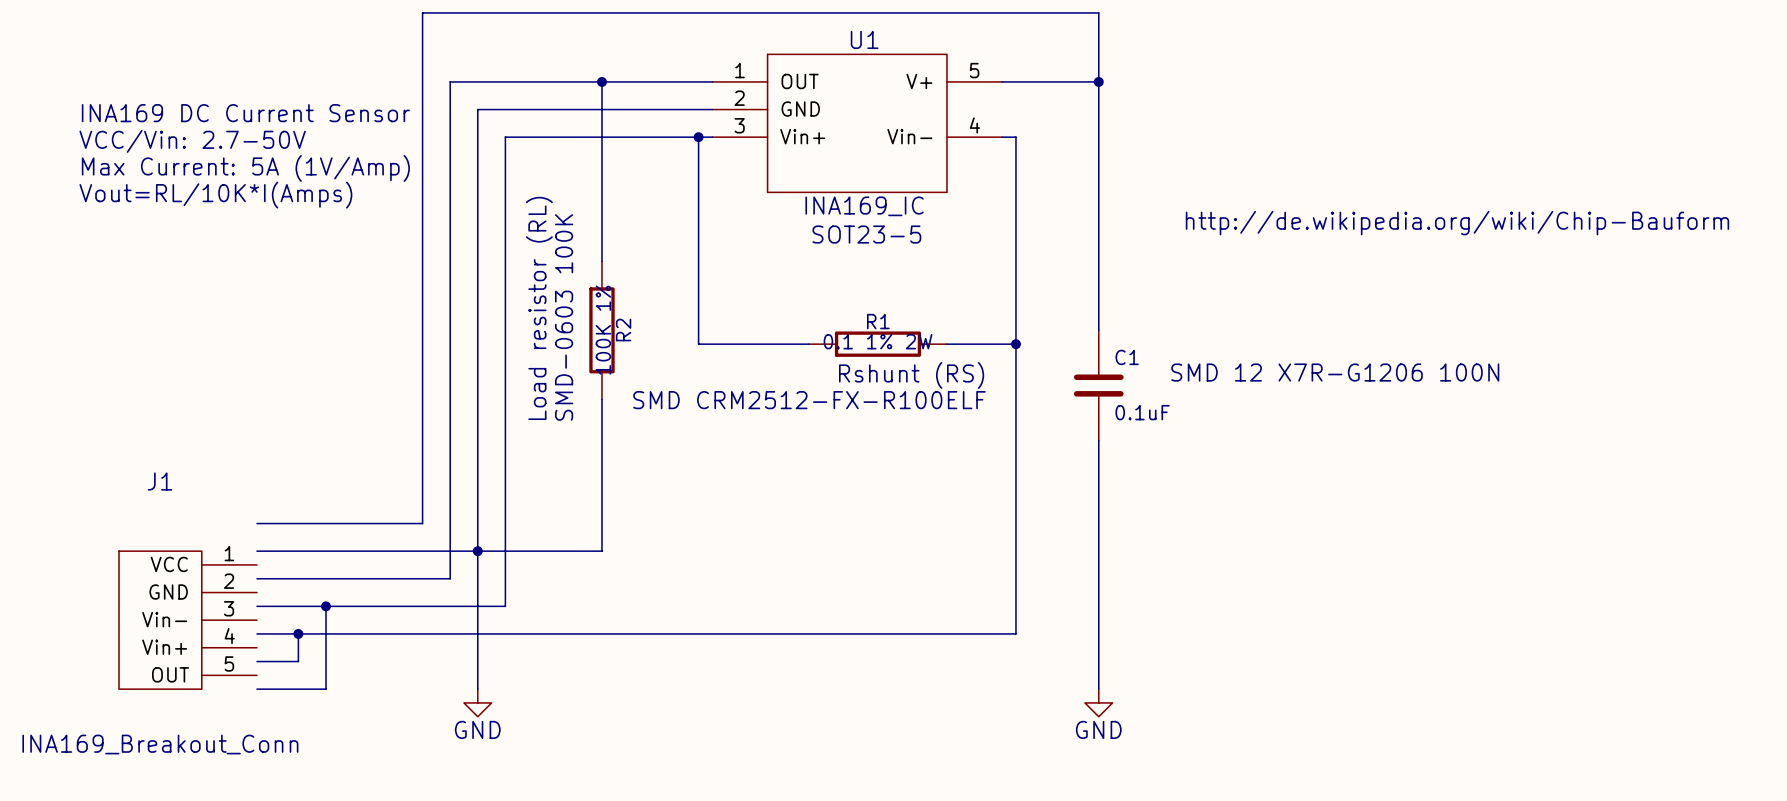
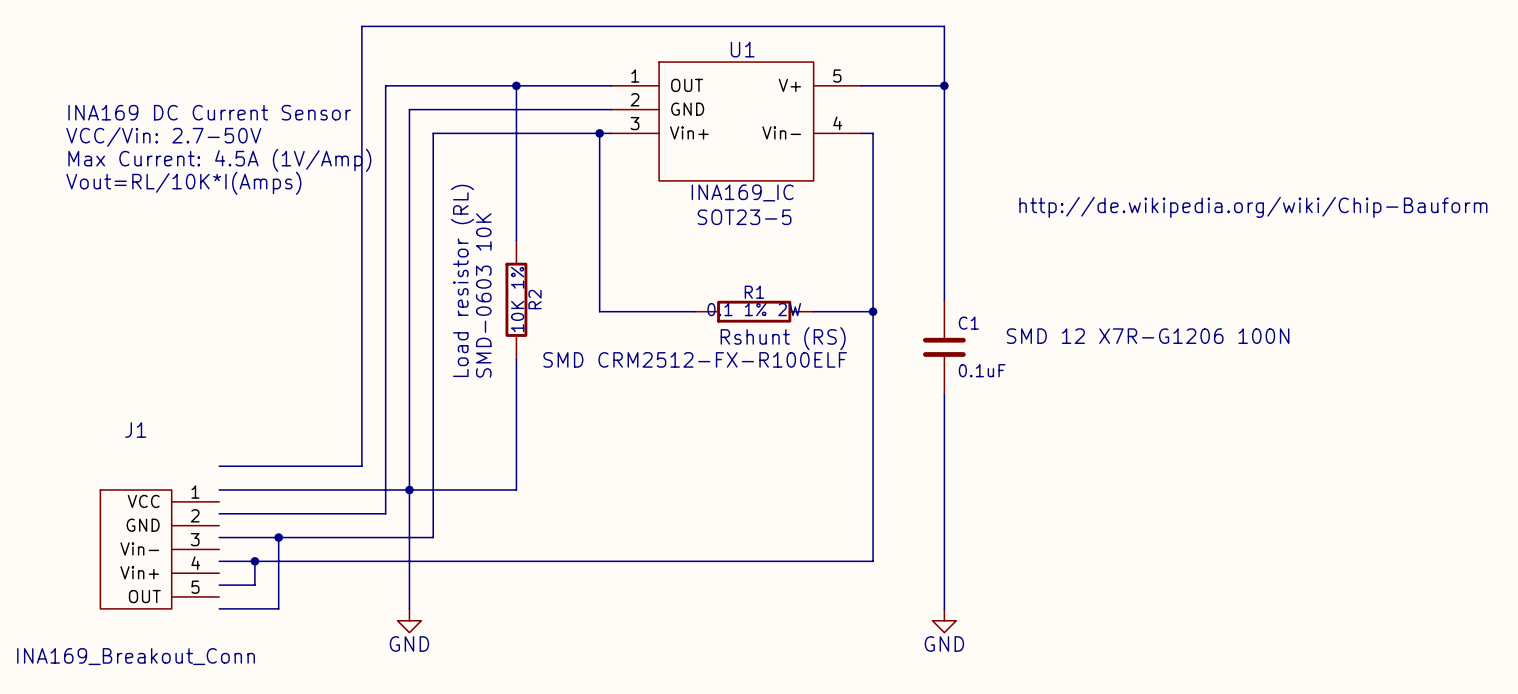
text: Max Current: 5A (1V/Amp) (245, 168) -> Max Current: 4.5A (1V/Amp) (219, 160)
text: SMD-0603 100K (564, 317) -> SMD-0603 10K (483, 295)
R2 value: 100K 1% (603, 330) -> 10K 1% (517, 299)

